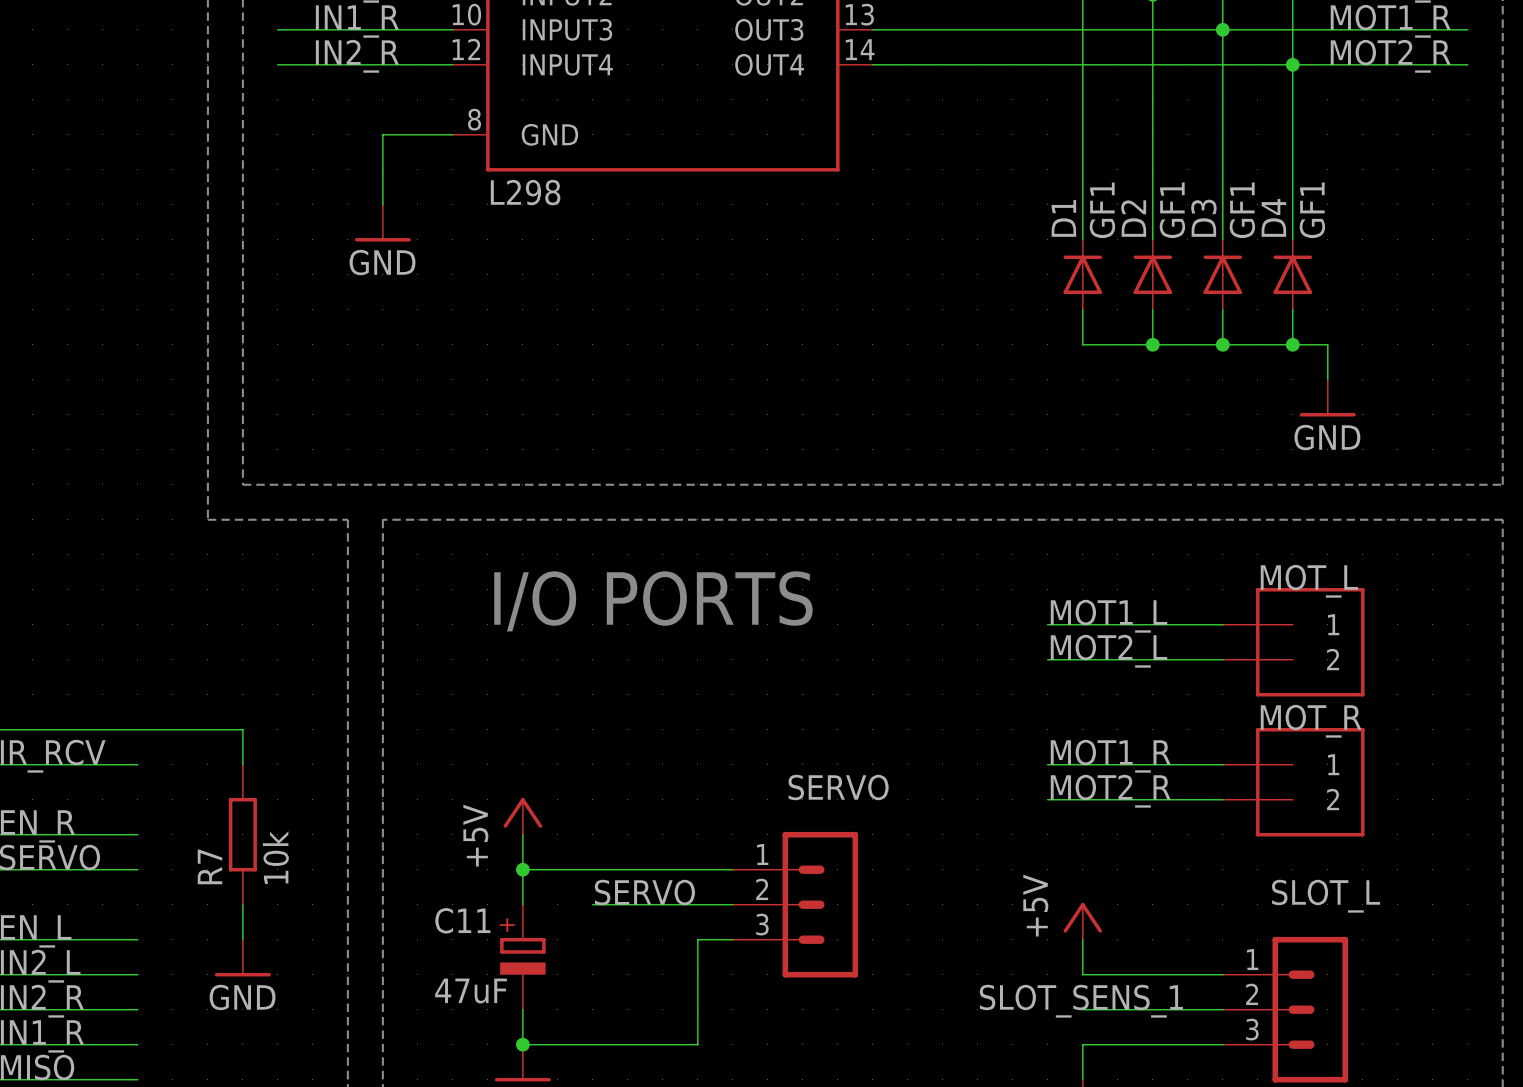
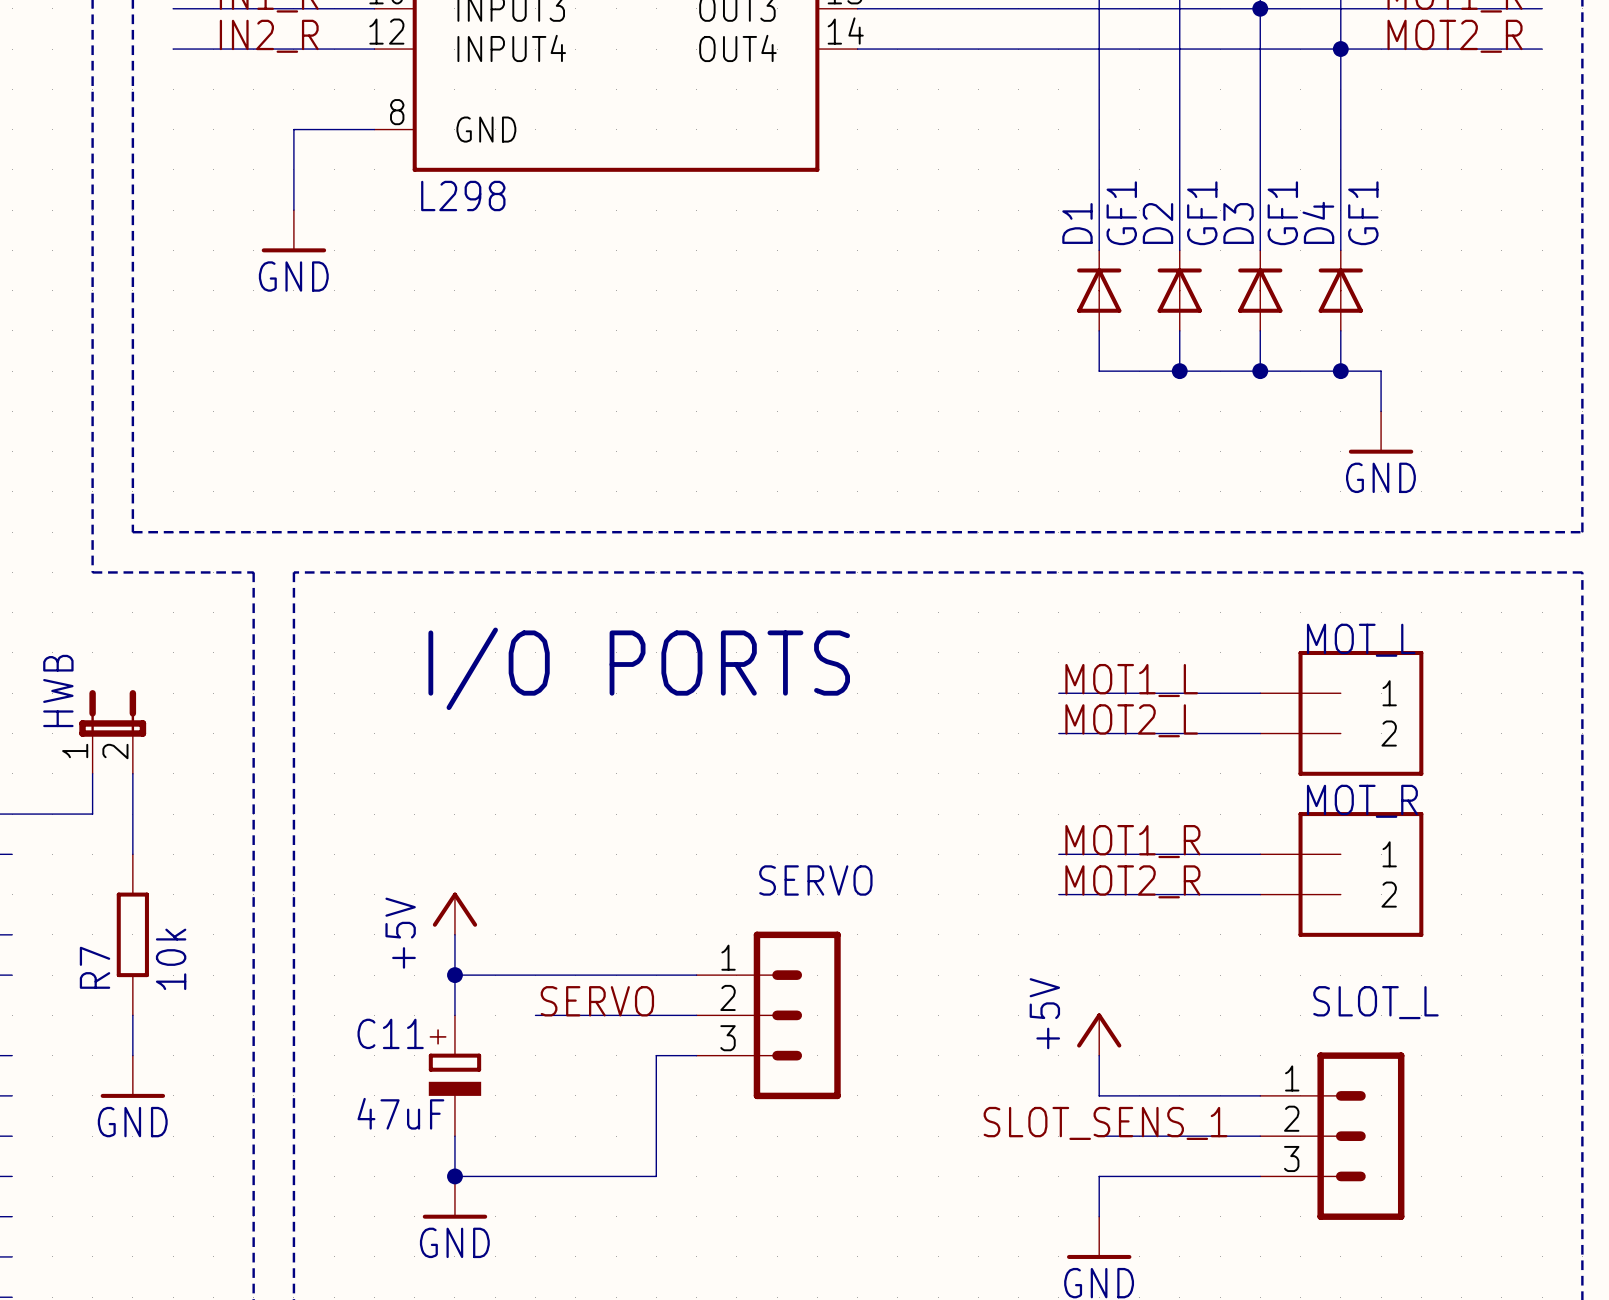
HWB: none -> (112, 731)
wire: none -> (132, 773) (132, 814)
wire: (207, 729) (242, 729) -> (92, 814) (92, 773)

